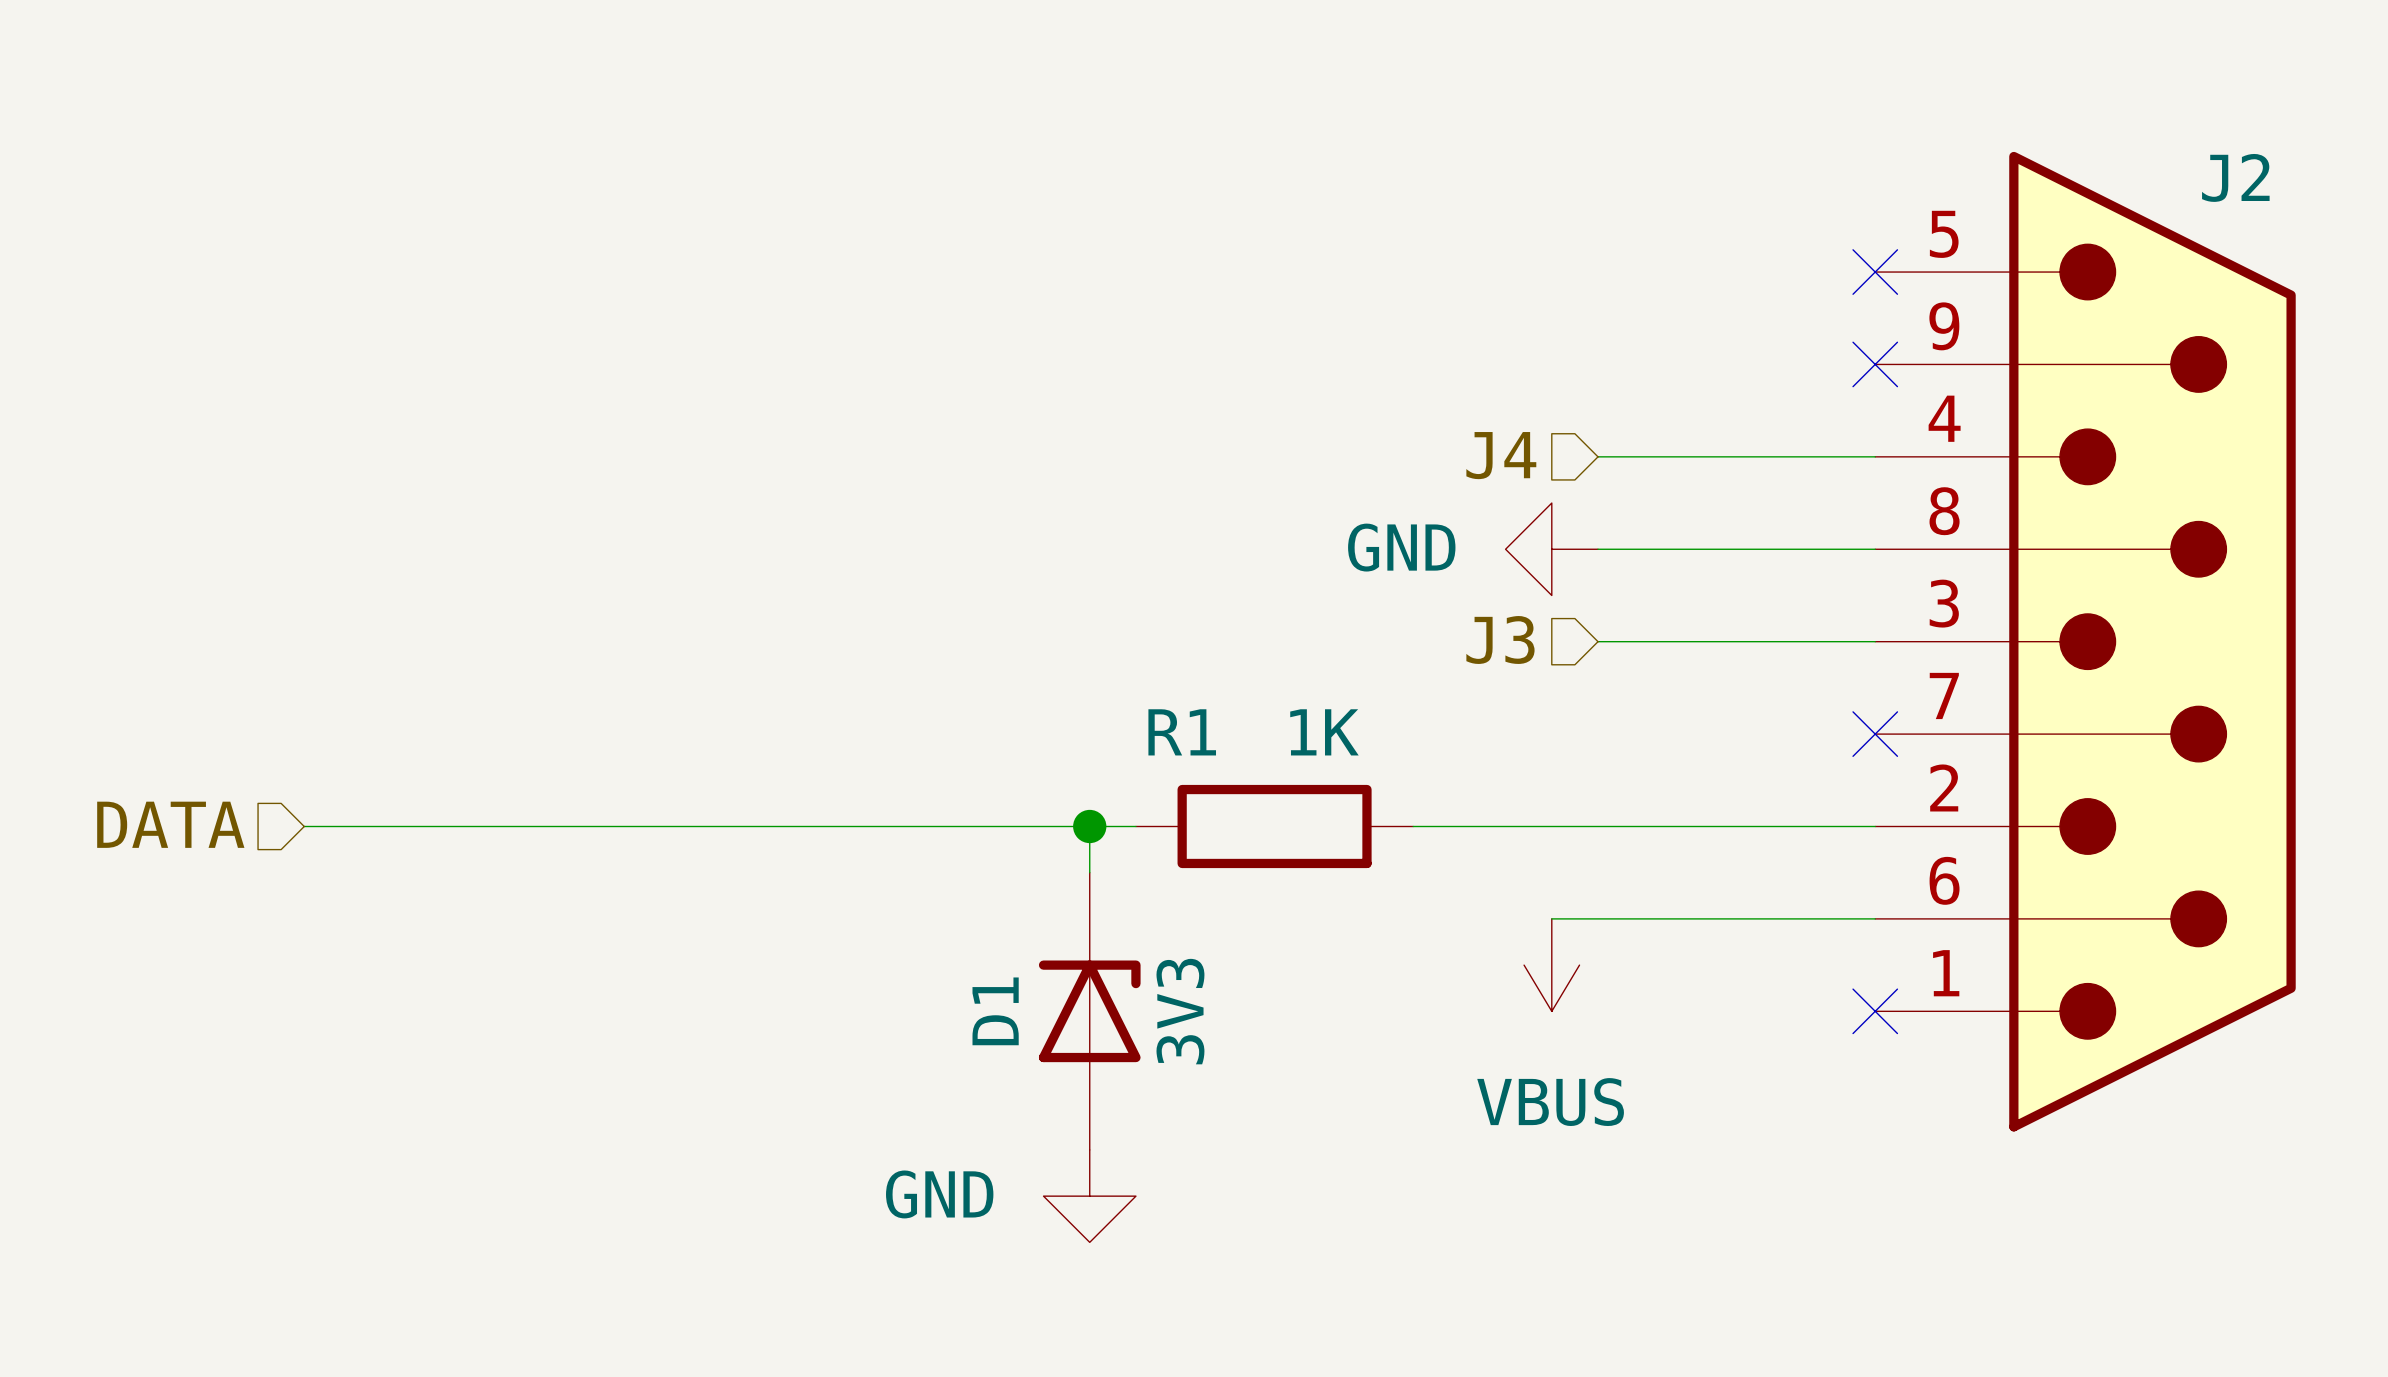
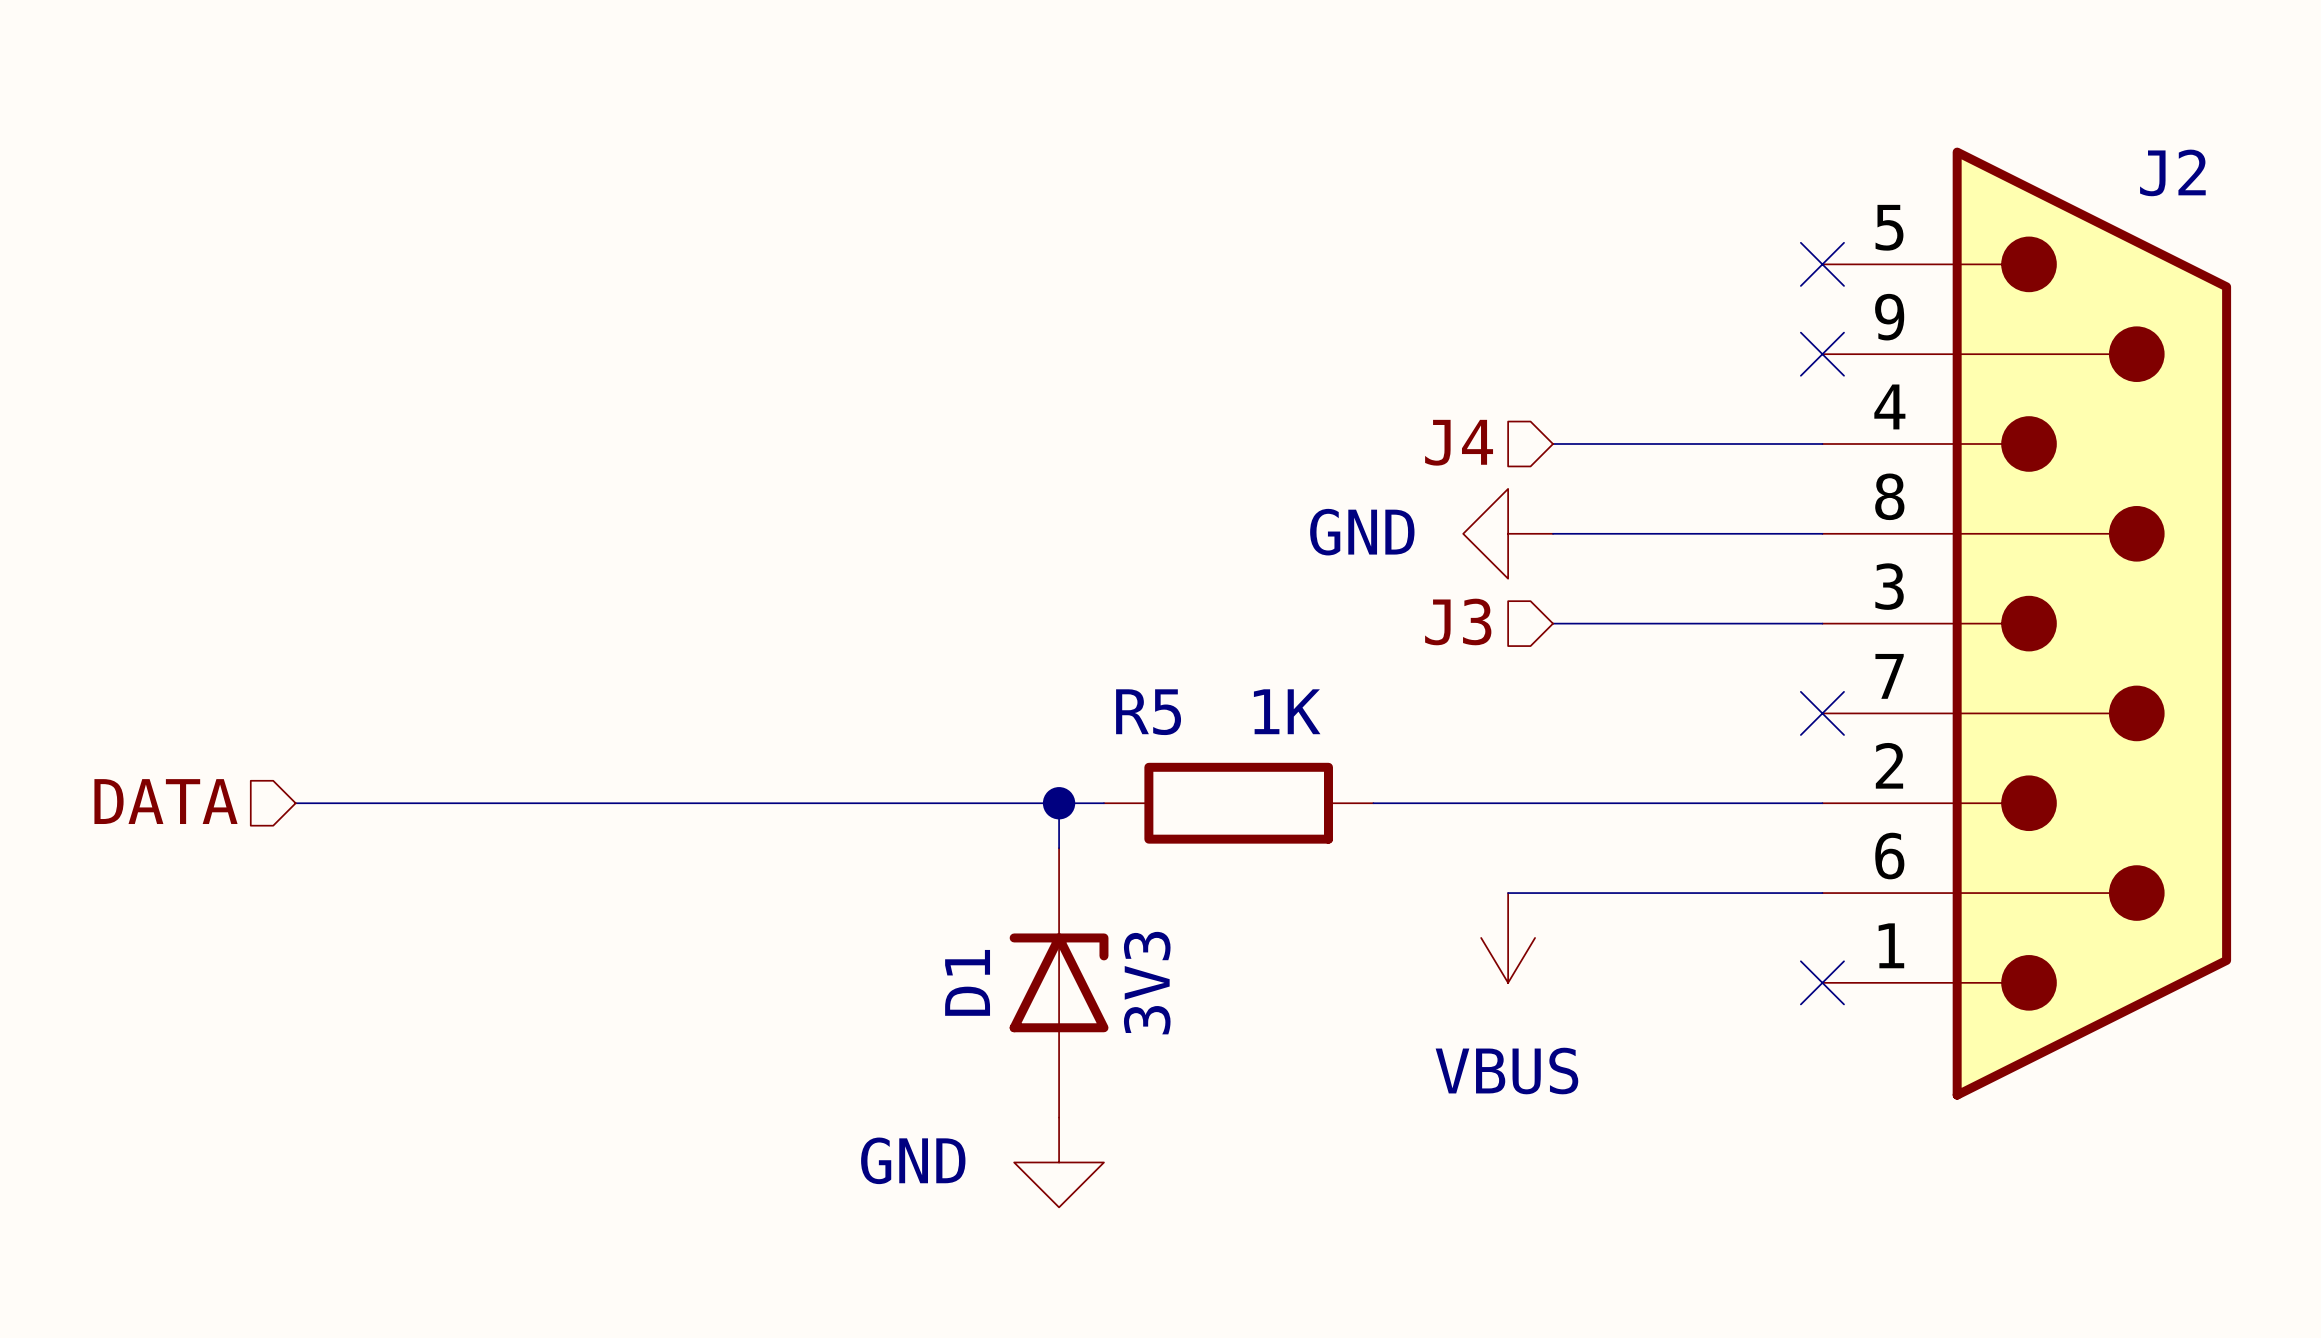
R1 name: R1 (1182, 732) -> R5 (1148, 712)

